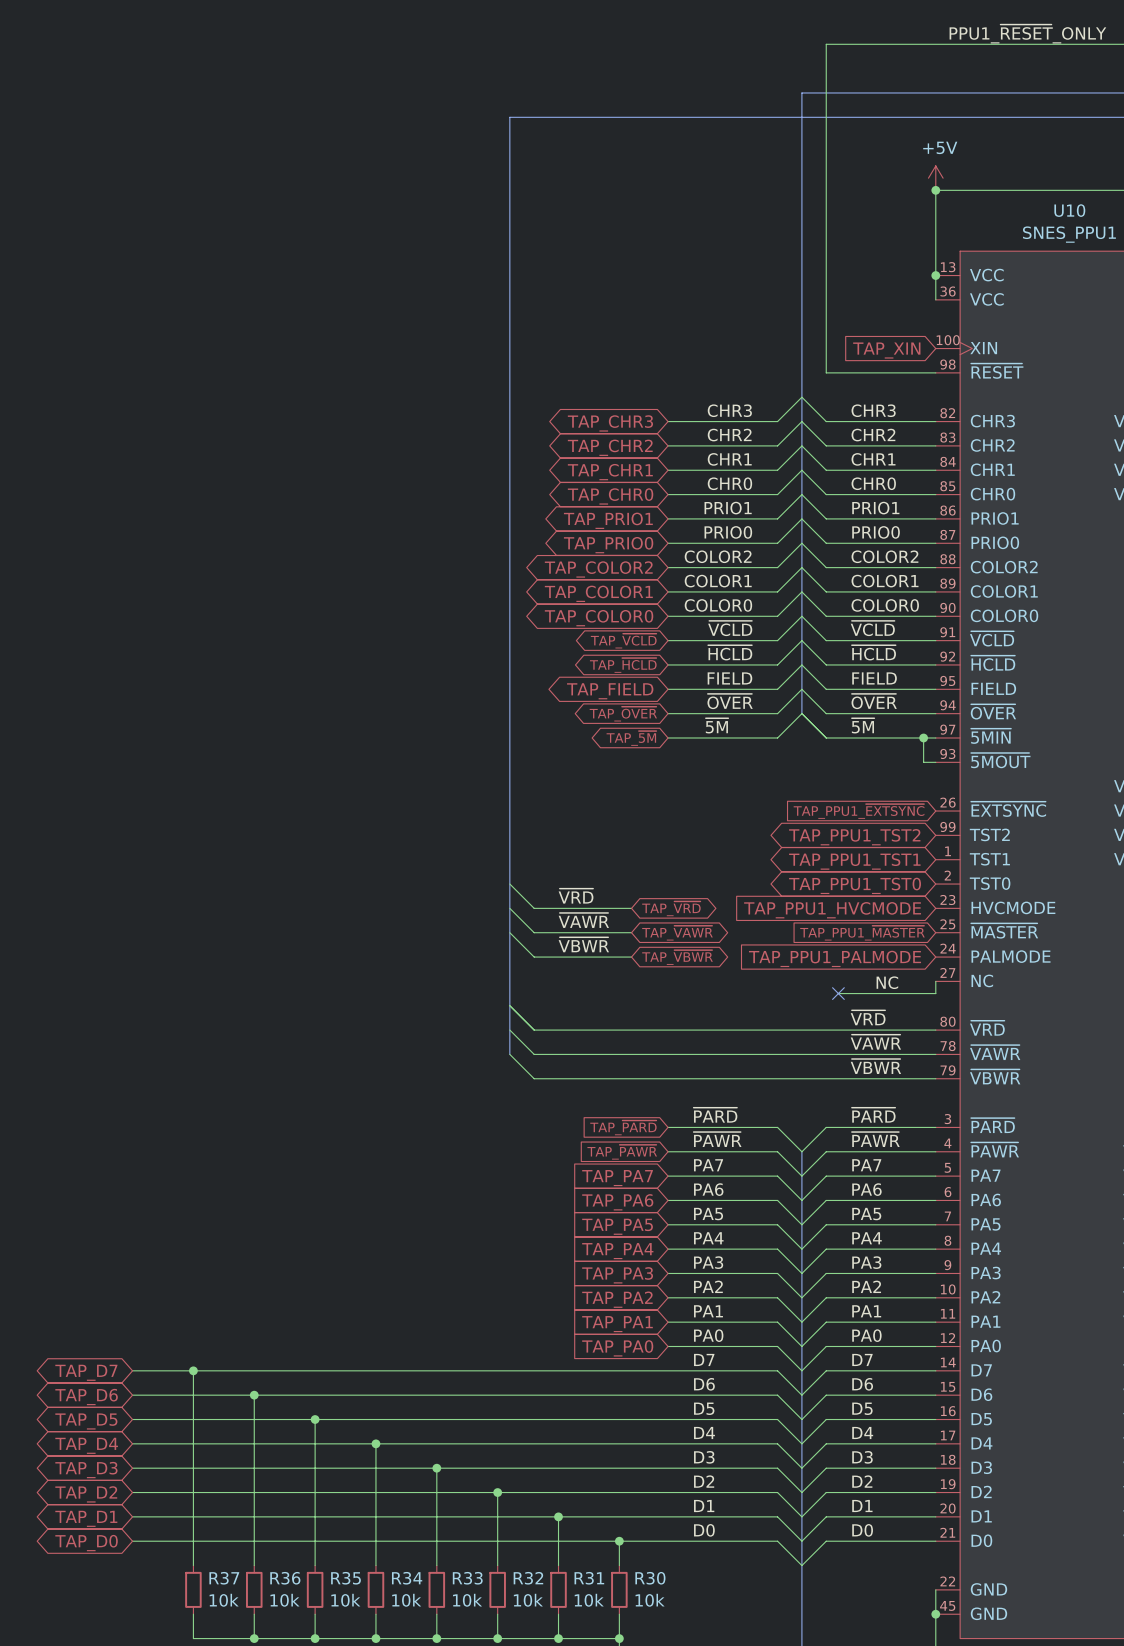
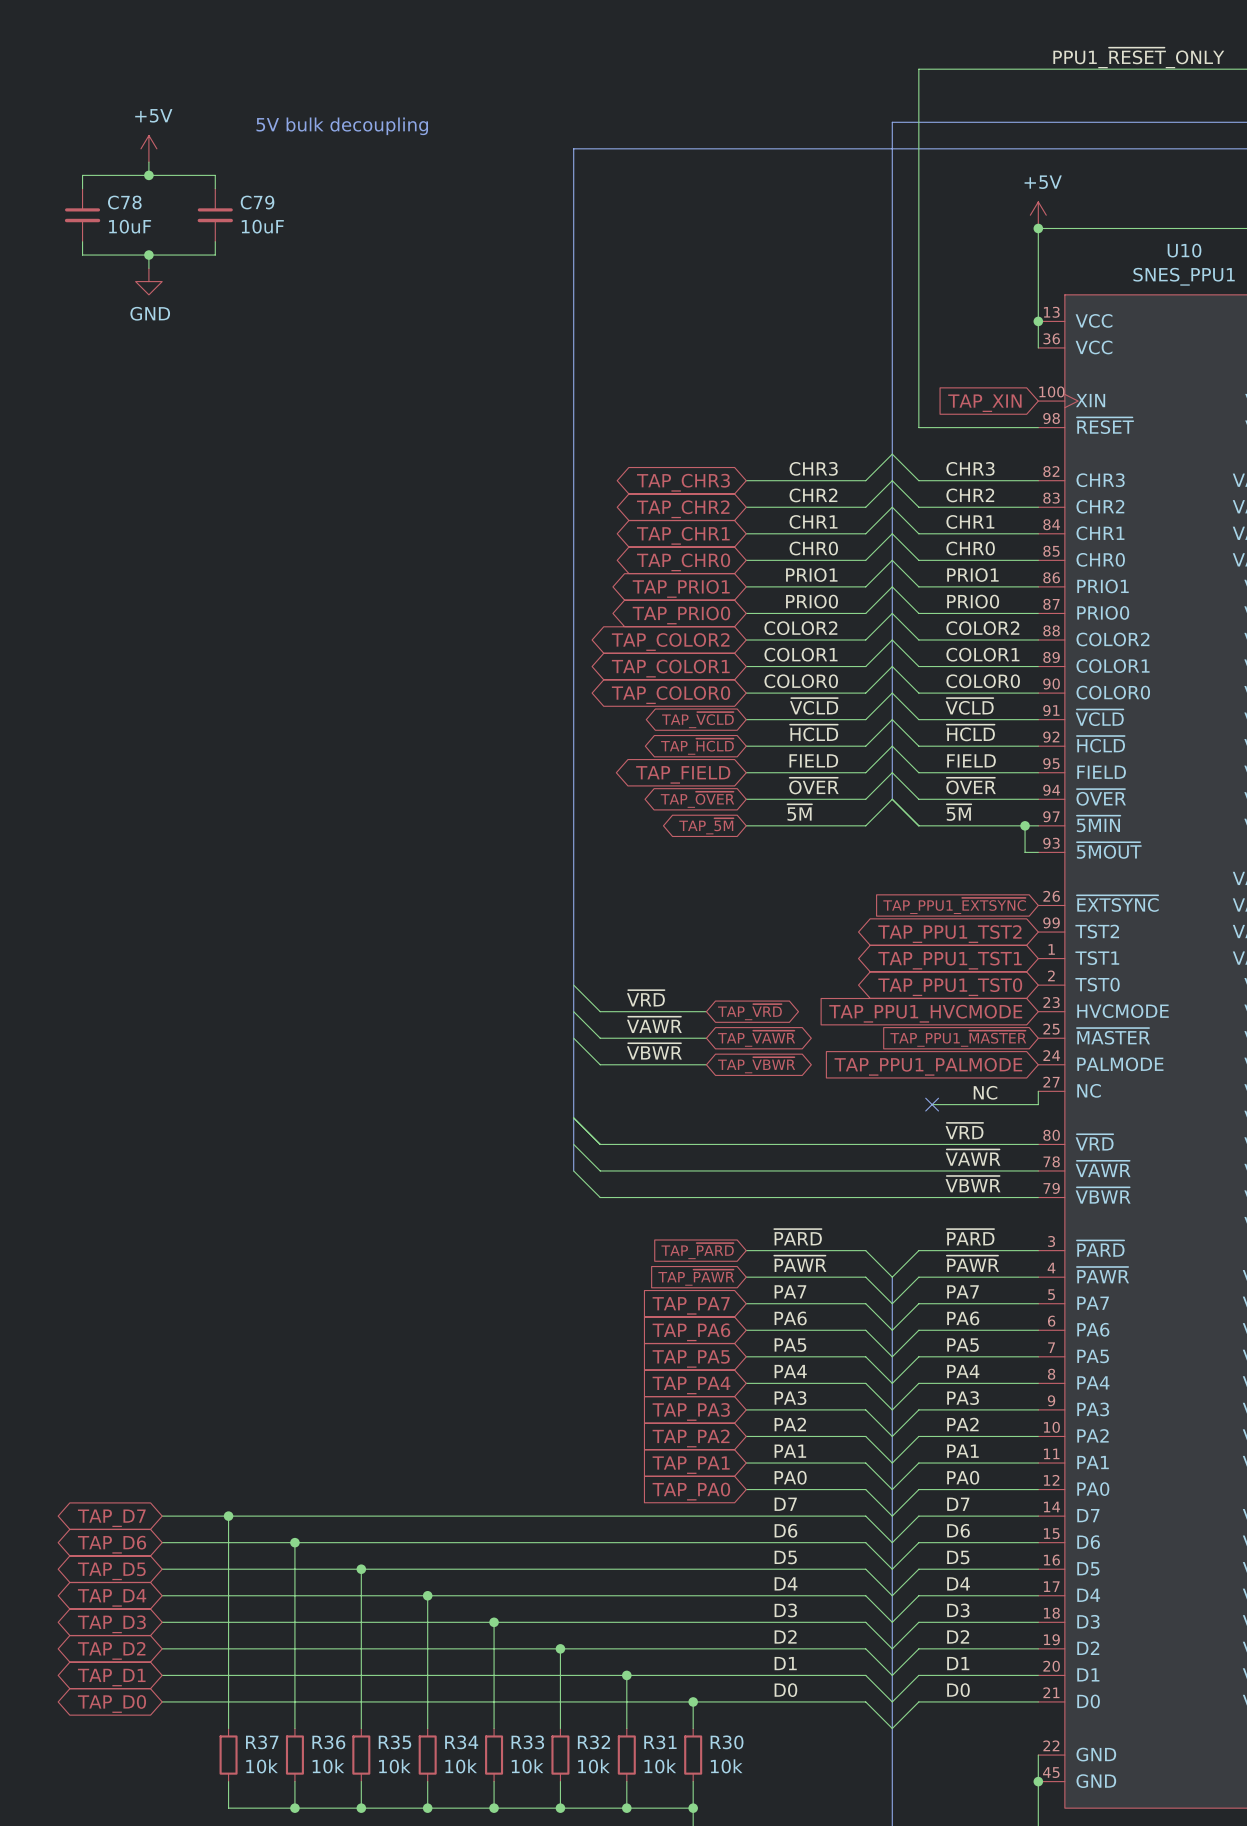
text: none -> 5V bulk decoupling (342, 126)
power symbol: none -> +5V (148, 148)
wire: none -> (148, 162) (148, 175)
junction: none -> (148, 175)
wire: none -> (82, 188) (82, 175) (215, 175) (215, 188)
C78: none -> 10uF (82, 215)
C79: none -> 10uF (215, 215)
wire: none -> (82, 241) (82, 255) (215, 255) (215, 241)
wire: none -> (148, 255) (148, 268)
junction: none -> (148, 255)
power symbol: none -> GND (148, 281)

